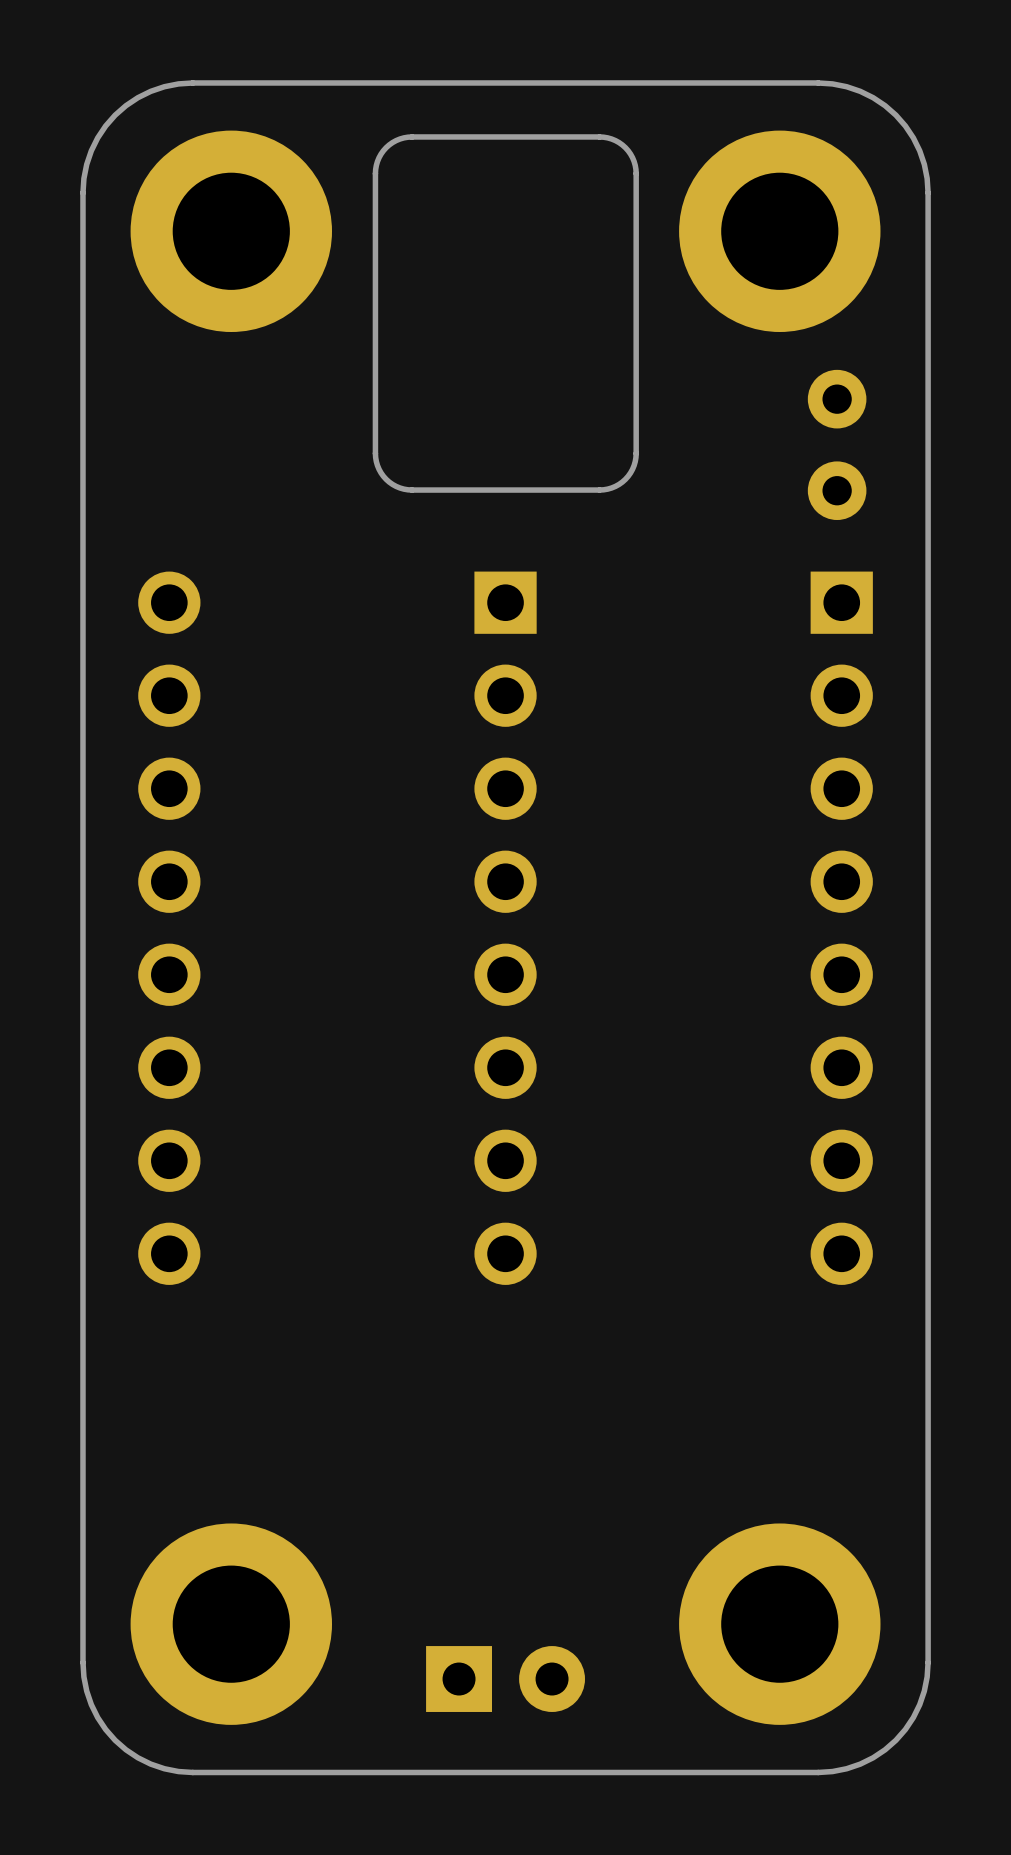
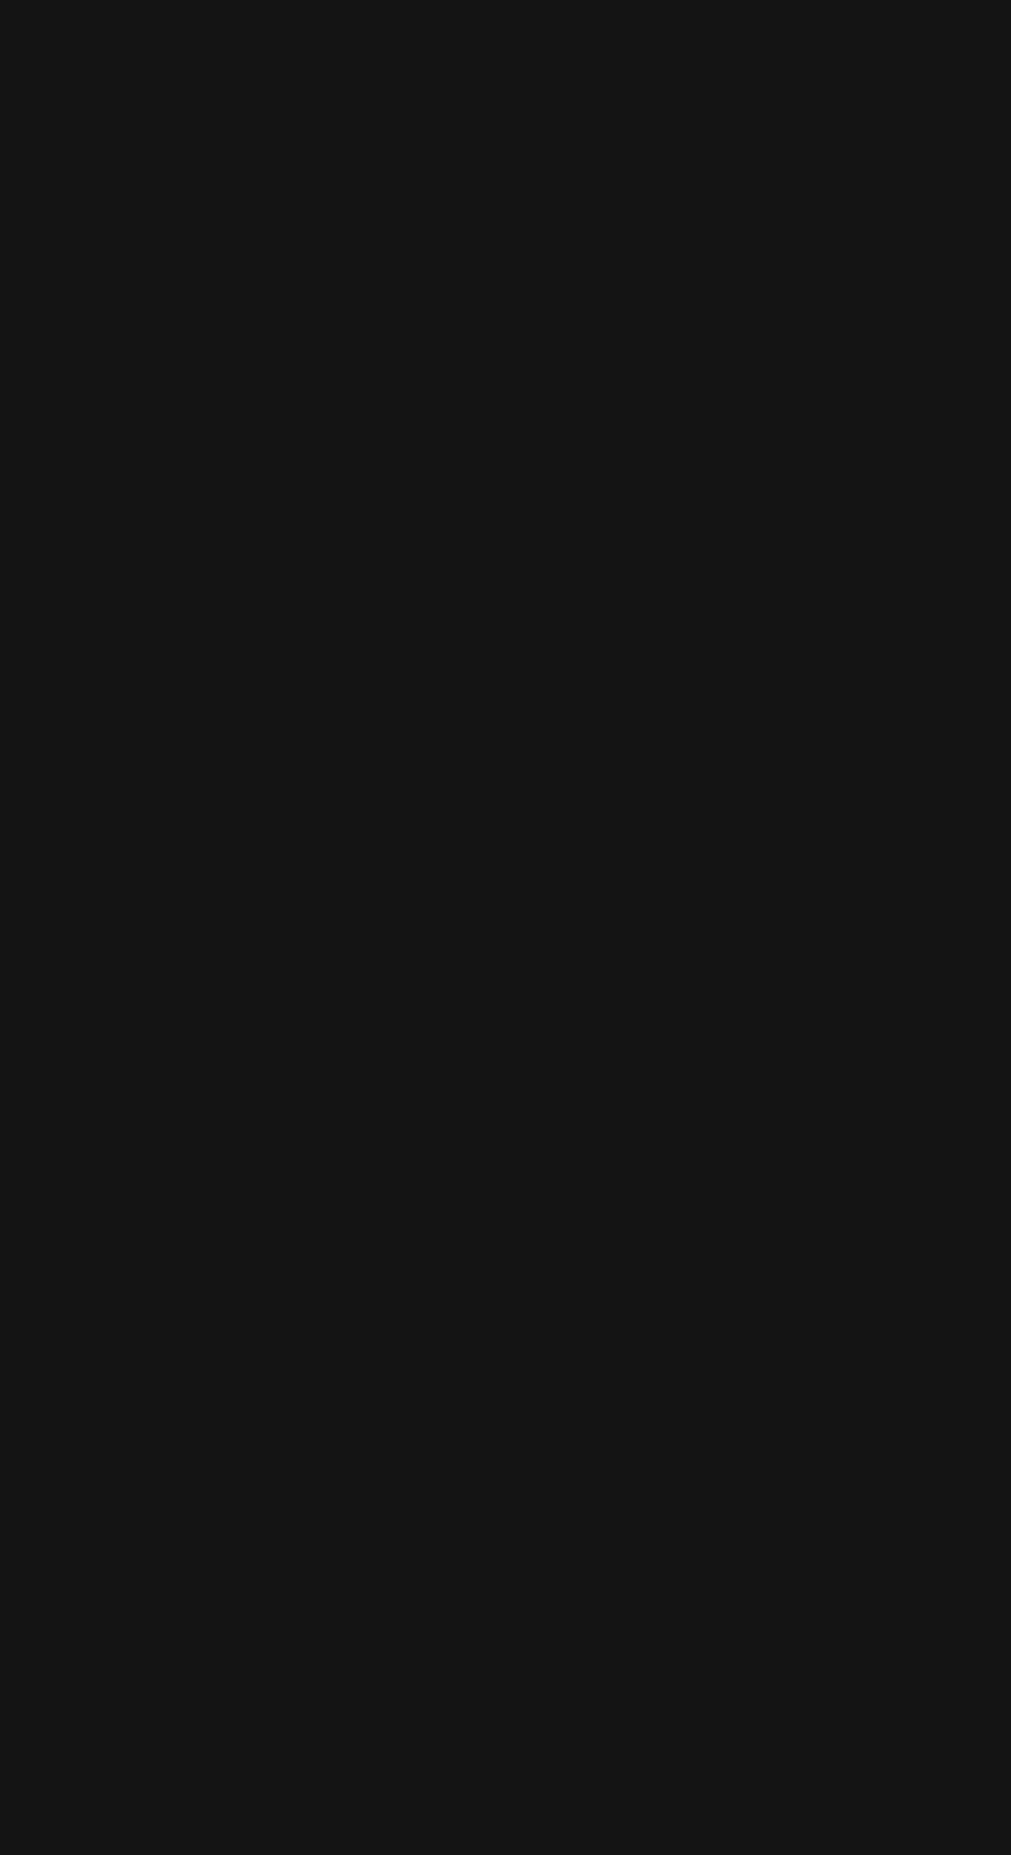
board edge: (818, 82) (178, 83) (150, 91) (125, 105) (105, 125) (91, 150) (86, 164) (82, 192) (82, 1662) (86, 1691) (97, 1717) (105, 1729) (125, 1749) (150, 1764) (164, 1768) (192, 1772) (832, 1771) (860, 1764) (885, 1749) (905, 1729) (919, 1704) (924, 1691) (928, 1662) (928, 192) (924, 164) (919, 150) (913, 137) (895, 115) (885, 105) (860, 91) (846, 86) (818, 82) -> none
board edge: (599, 136) (407, 137) (392, 142) (381, 154) (375, 173) (375, 453) (379, 469) (392, 484) (412, 490) (599, 490) (619, 484) (630, 472) (636, 453) (635, 169) (632, 157) (625, 147) (615, 140) (599, 136) -> none
part: (231, 231) -> none
part: (779, 231) -> none
part: (837, 444) -> none
part: (169, 928) -> none
part: (505, 928) -> none
part: (841, 928) -> none
part: (231, 1624) -> none
part: (779, 1624) -> none
part: (505, 1679) -> none

